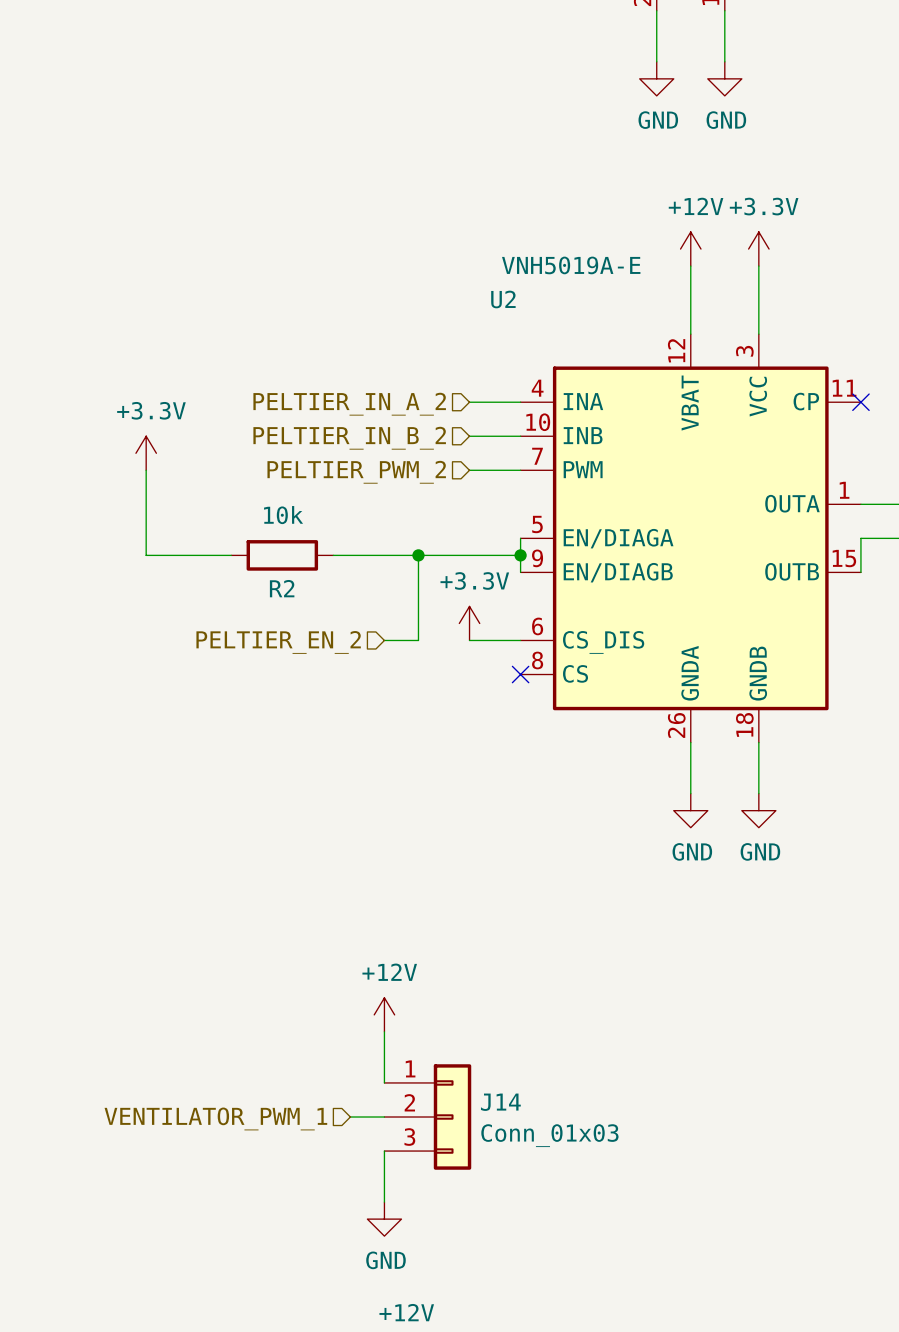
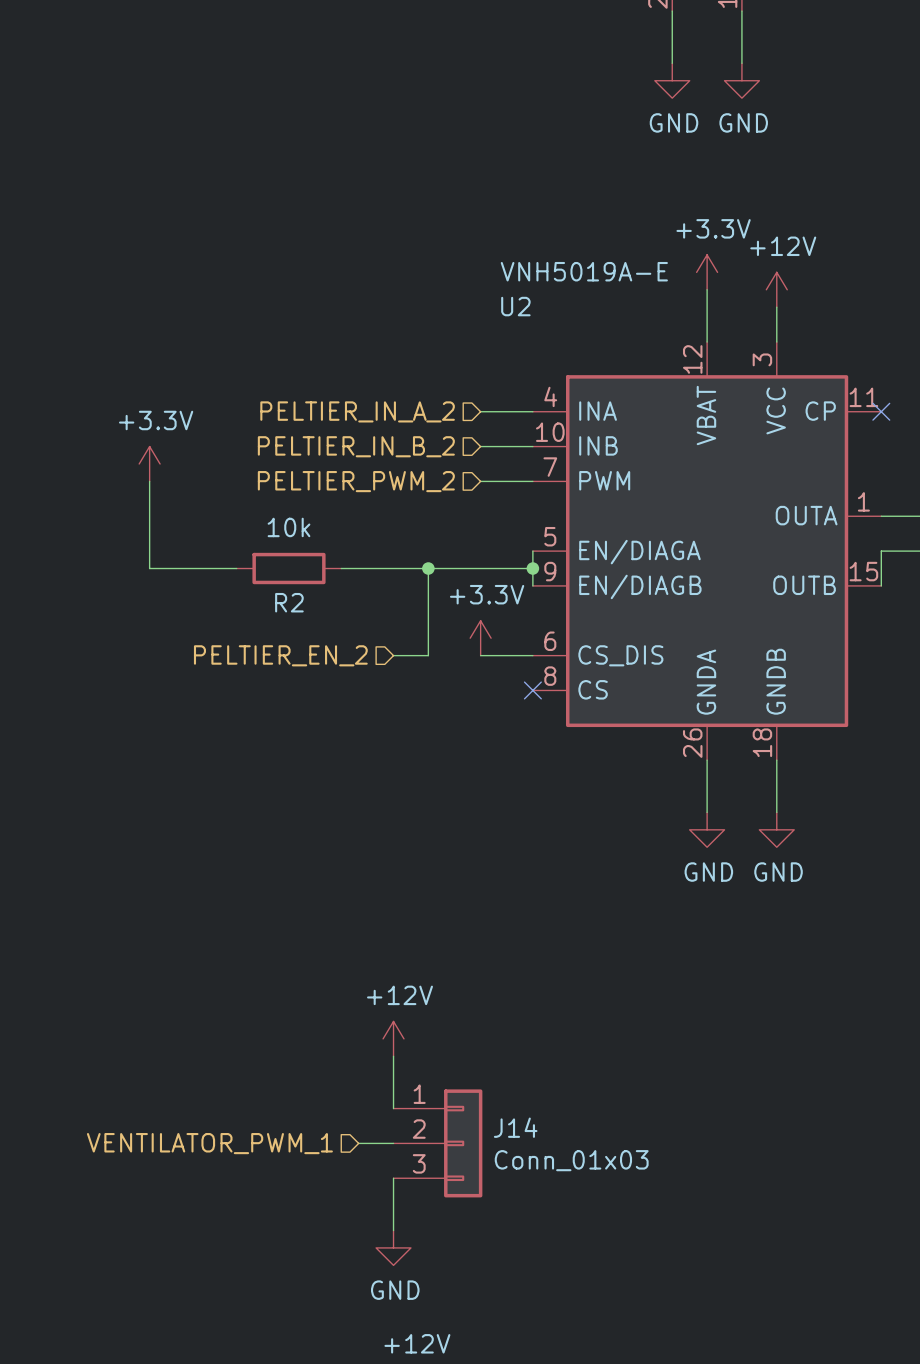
power symbol position: +12V (690, 249) -> +12V (776, 289)
power symbol position: +3.3V (758, 249) -> +3.3V (707, 272)

